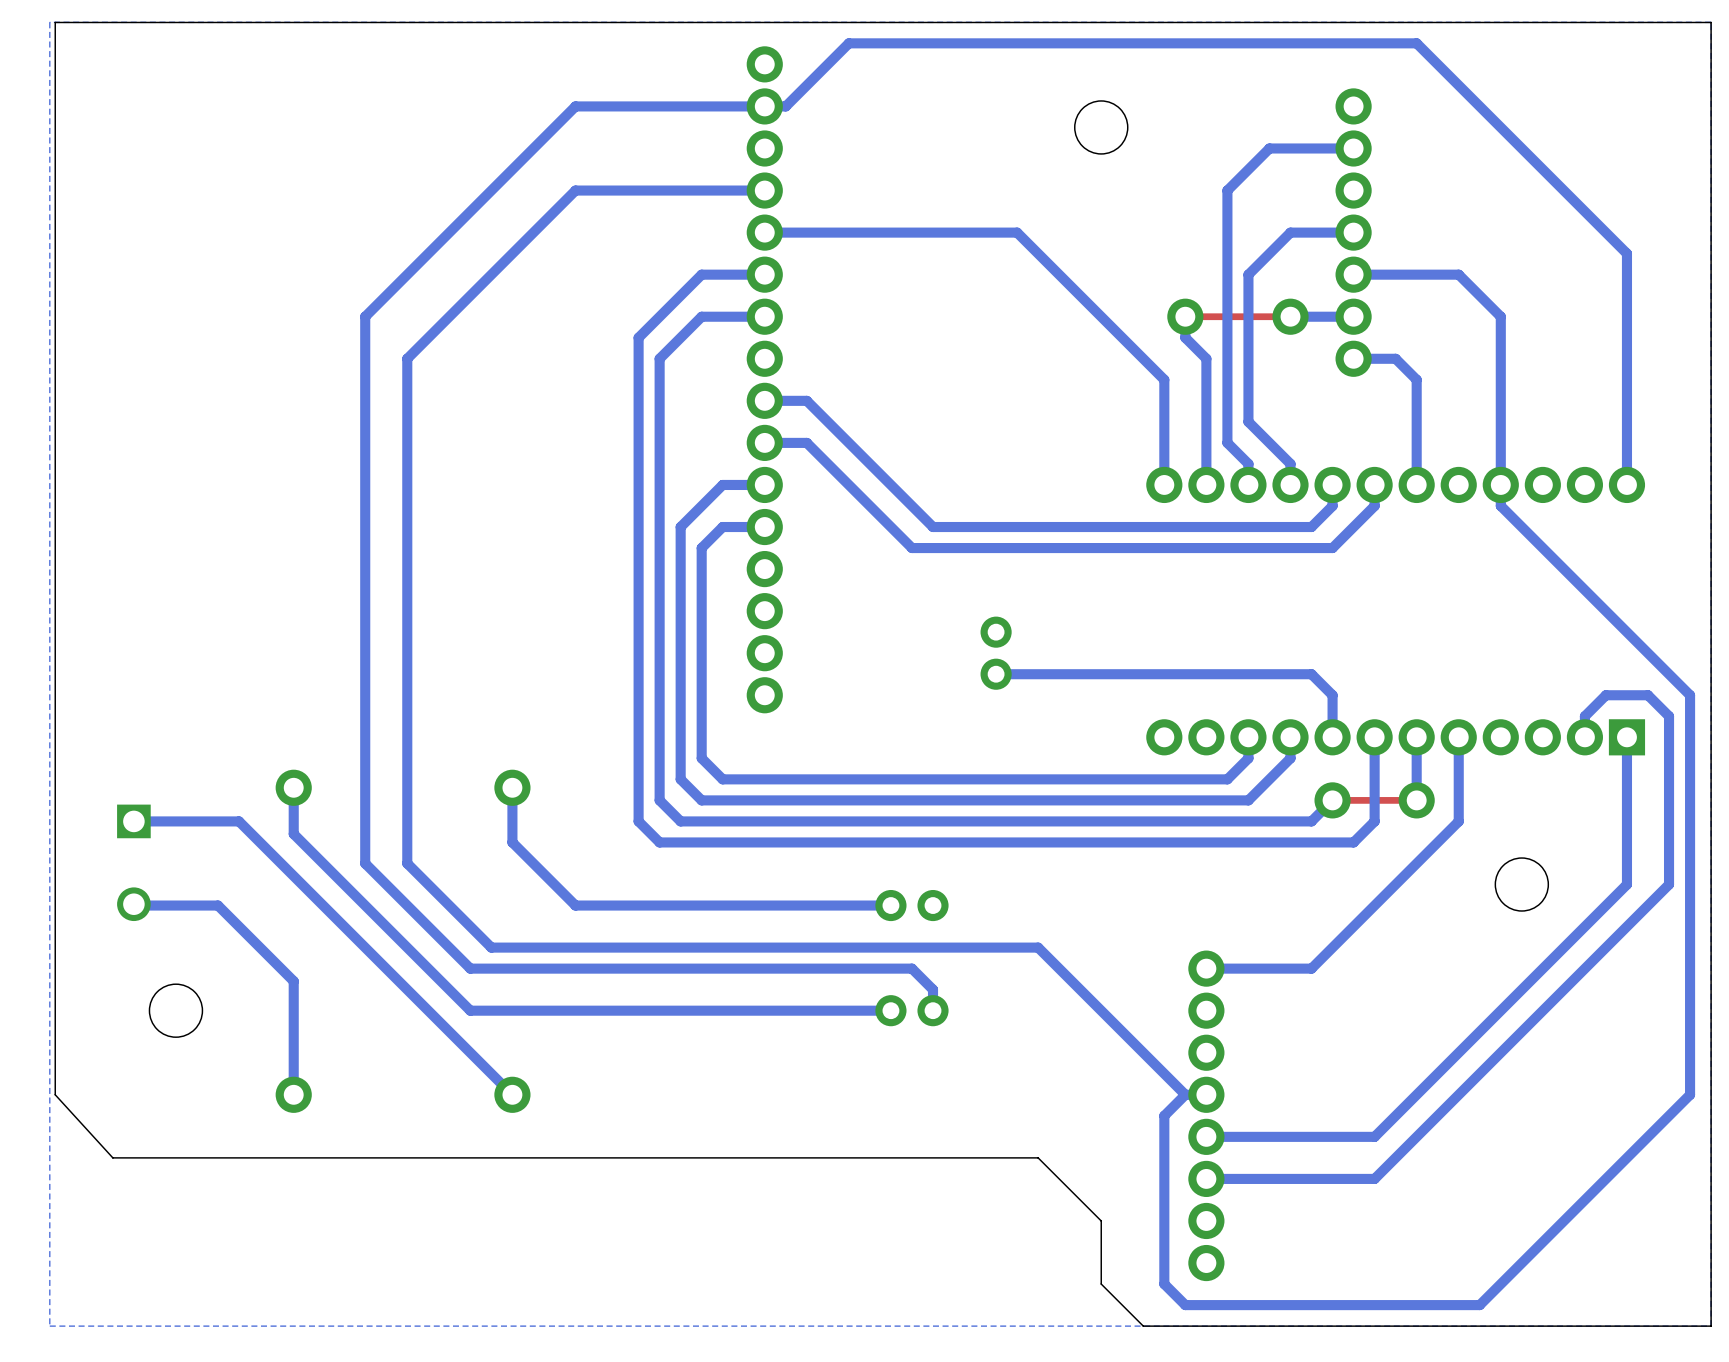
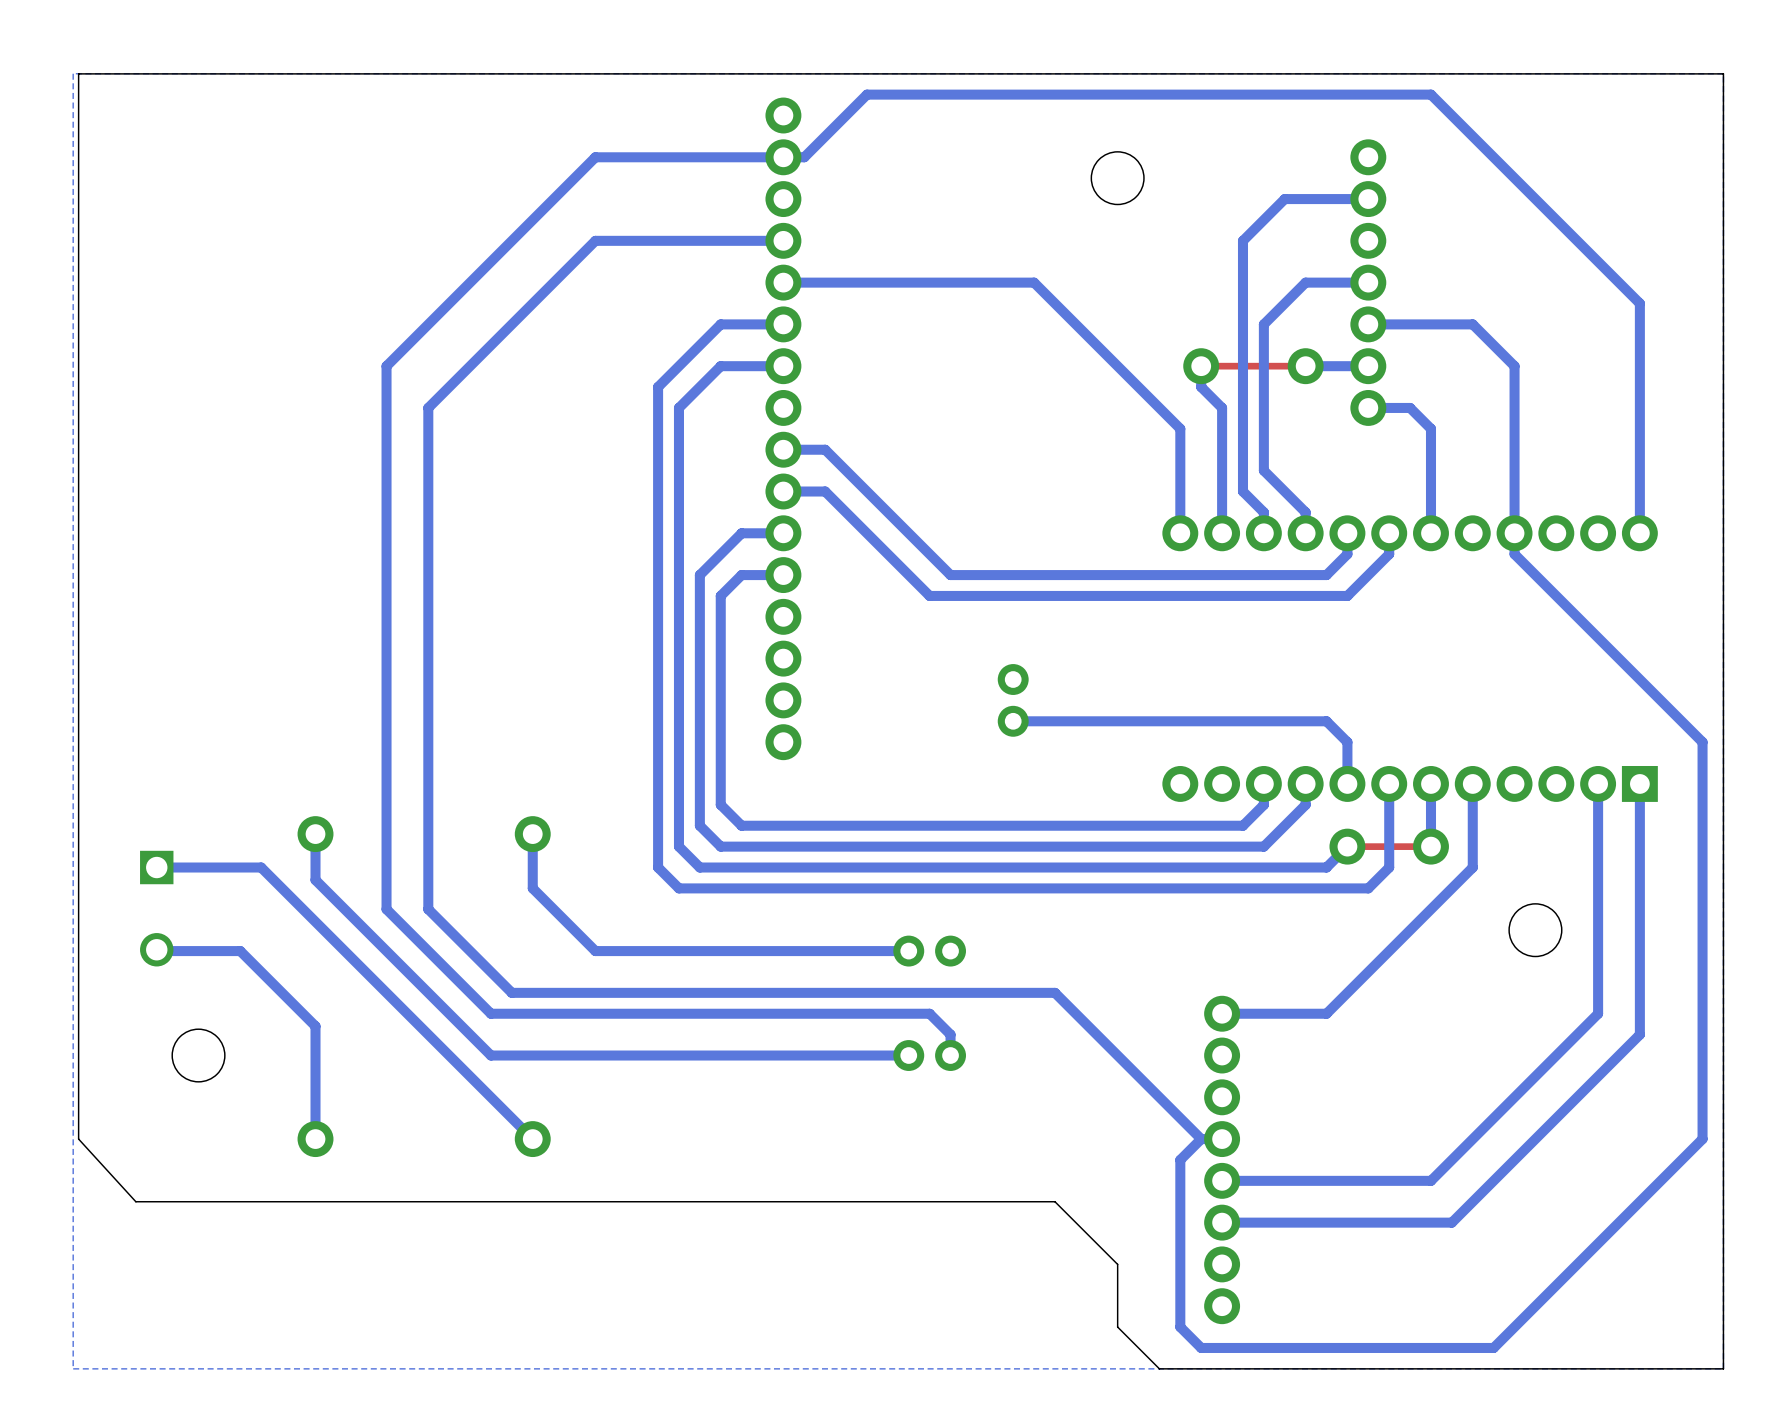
bottom track: (1584, 737) (1584, 716) (1605, 695) (1648, 695) (1669, 716) (1669, 884) (1584, 968) -> (1598, 783) (1598, 1013)
bottom track: (1626, 884) (1374, 1136) -> (1639, 930) (1639, 1034) (1451, 1222) (1389, 1222)
bottom track: (1416, 1136) (1374, 1178) -> (1430, 1180) (1389, 1180)

